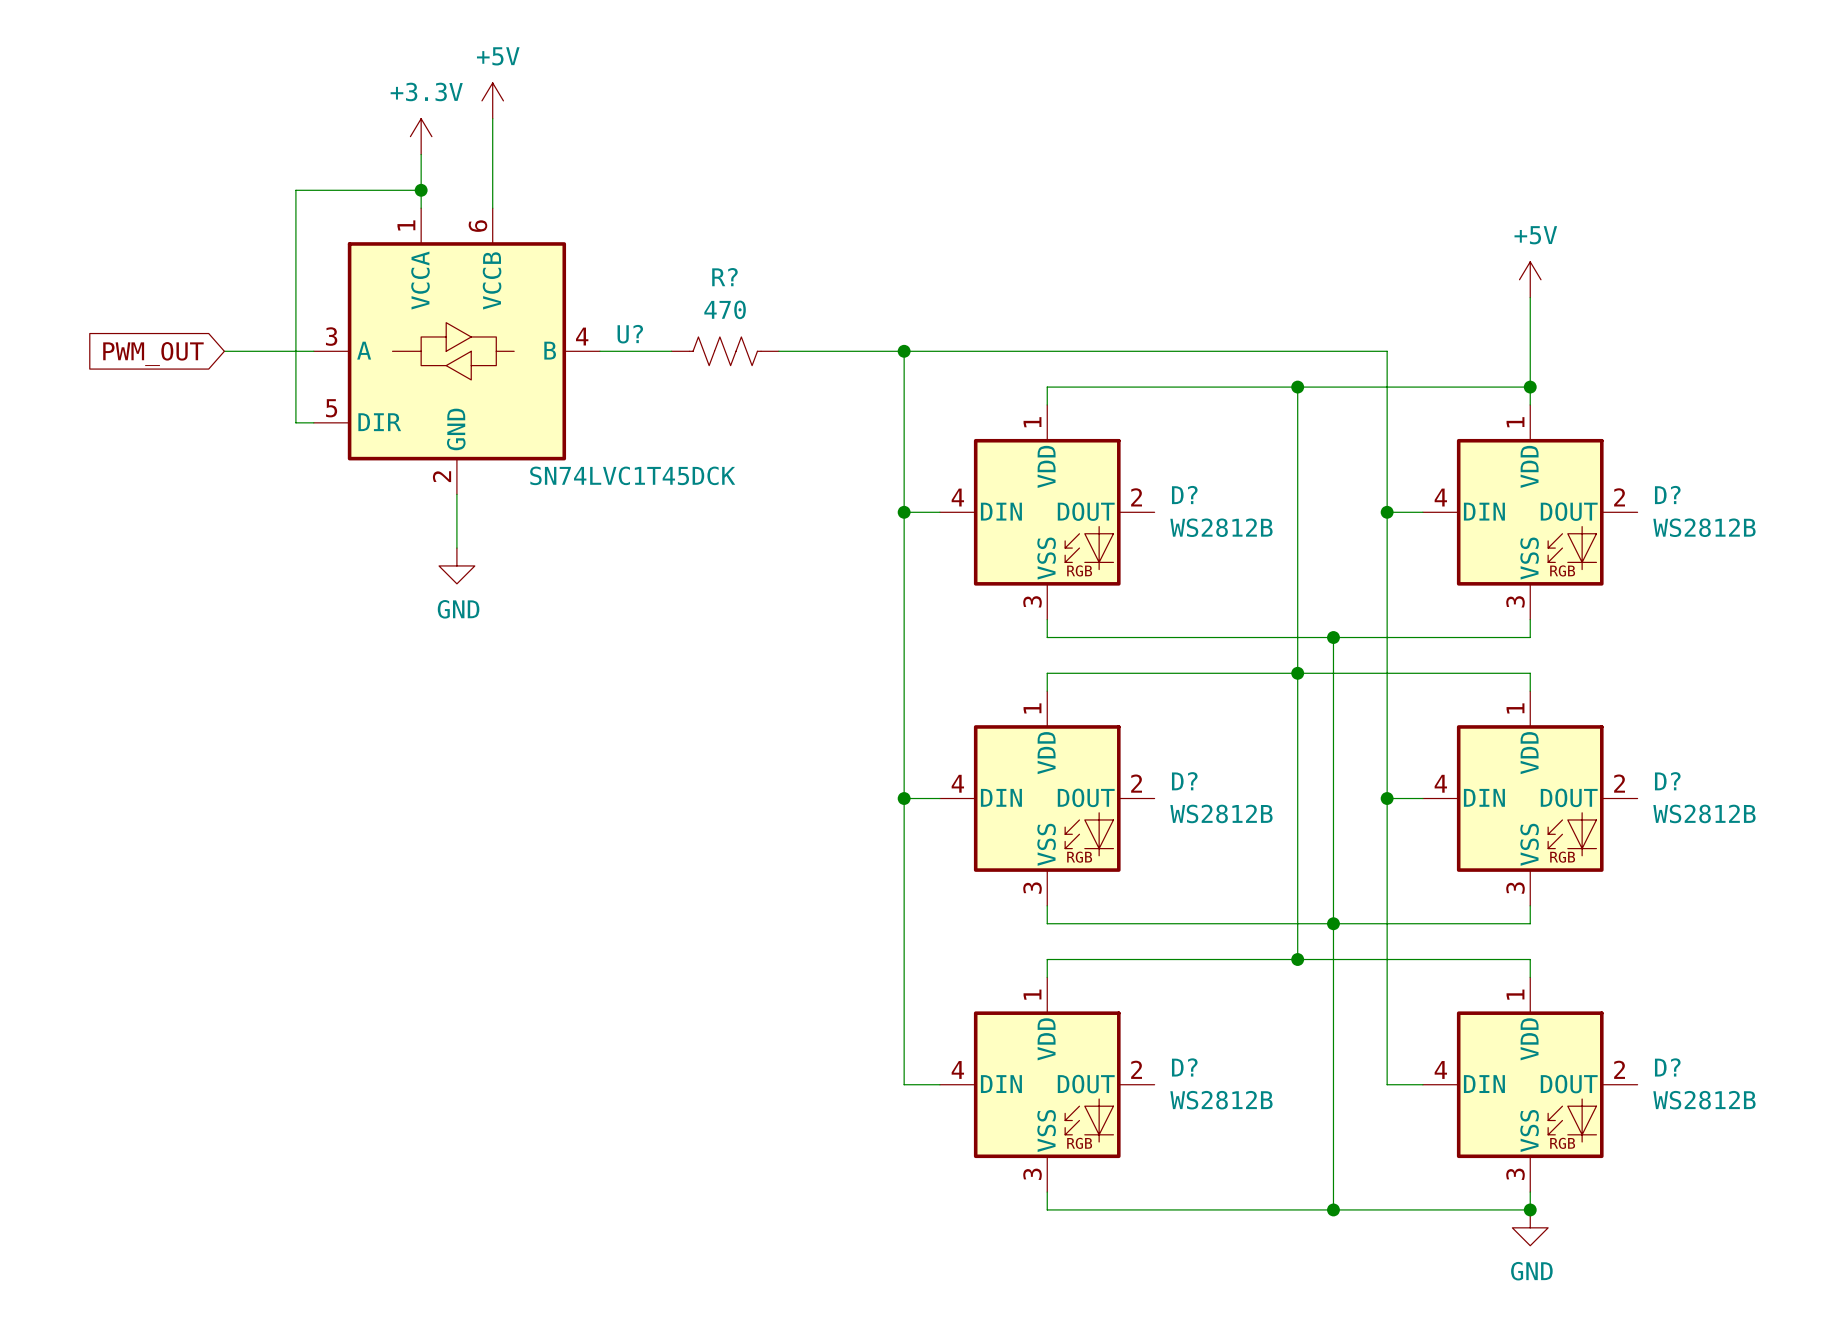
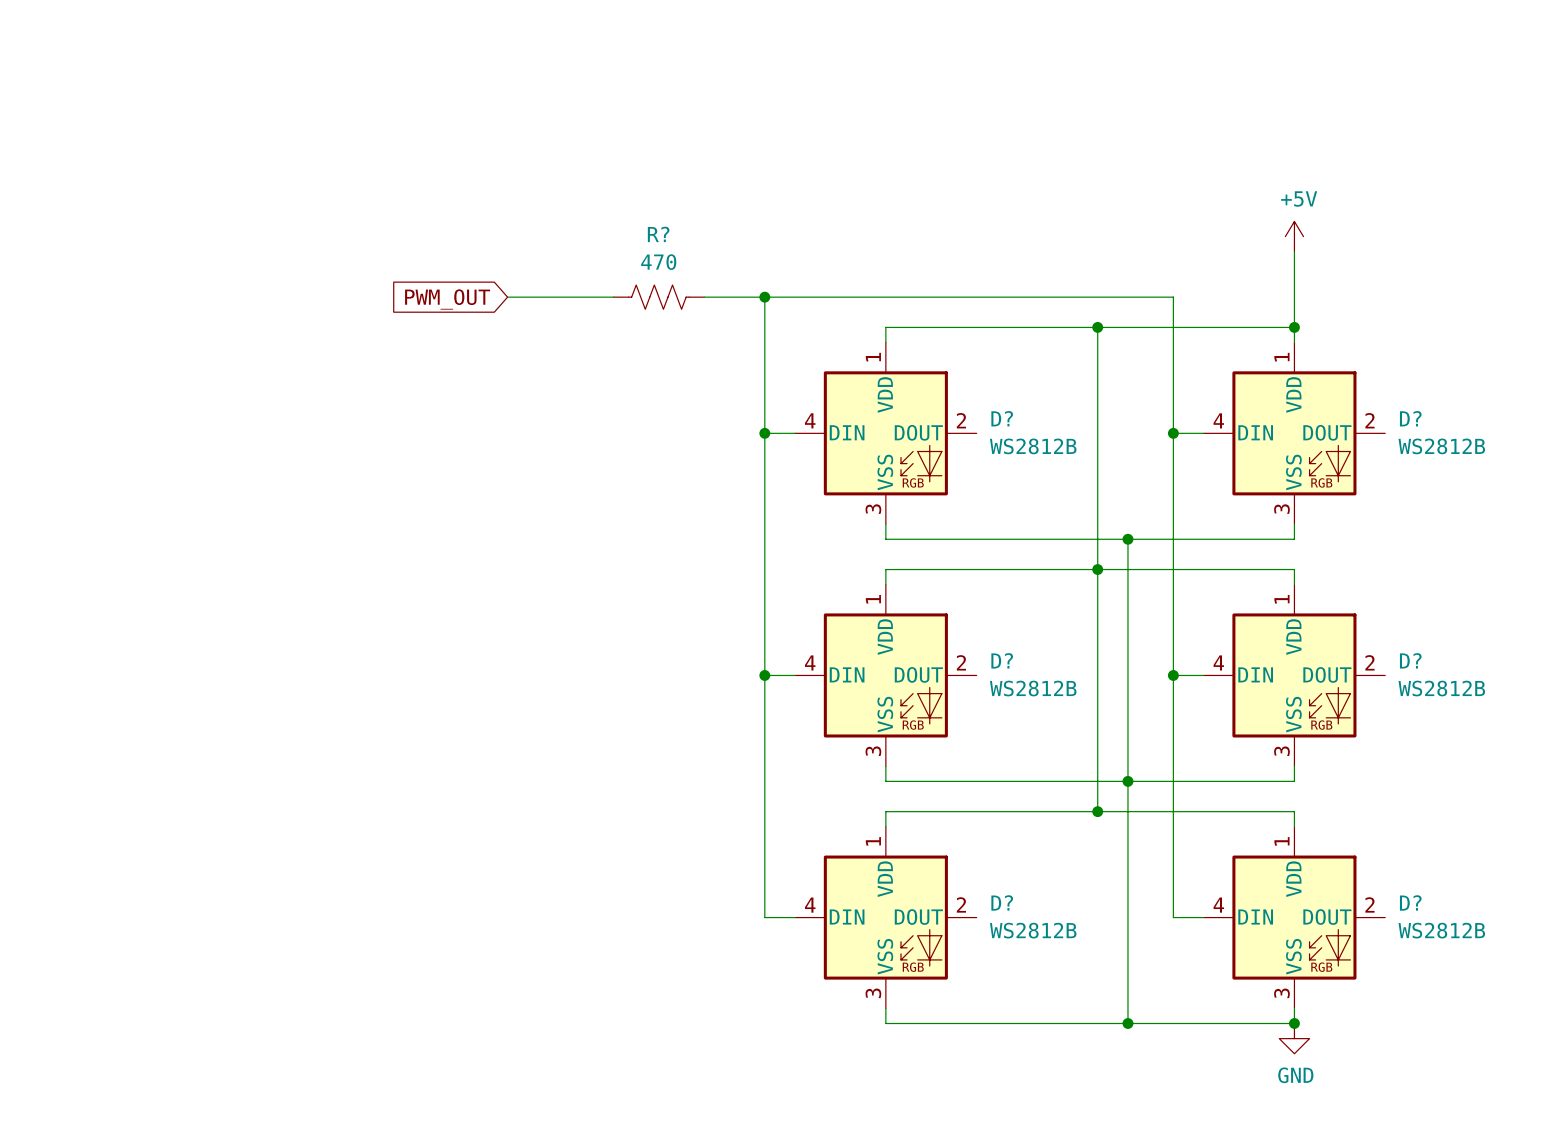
power symbol: +5V (492, 100) -> none
wire: (492, 118) (492, 208) -> none
power symbol: +3.3V (421, 136) -> none
wire: (421, 154) (421, 208) -> none
wire: (421, 190) (295, 190) (295, 422) (313, 422) -> none
junction: (421, 190) -> none
wire: (224, 351) (313, 351) -> none
U?: SN74LVC1T45DCK (456, 351) -> none
R? position: (725, 351) -> (658, 297)
wire: (778, 351) (832, 351) -> (568, 297) (613, 297)
global label: PWM_OUT (153, 354) -> none
global label: none -> PWM_OUT (447, 299)
wire: (456, 494) (456, 548) -> none
power symbol: GND (456, 565) -> none

